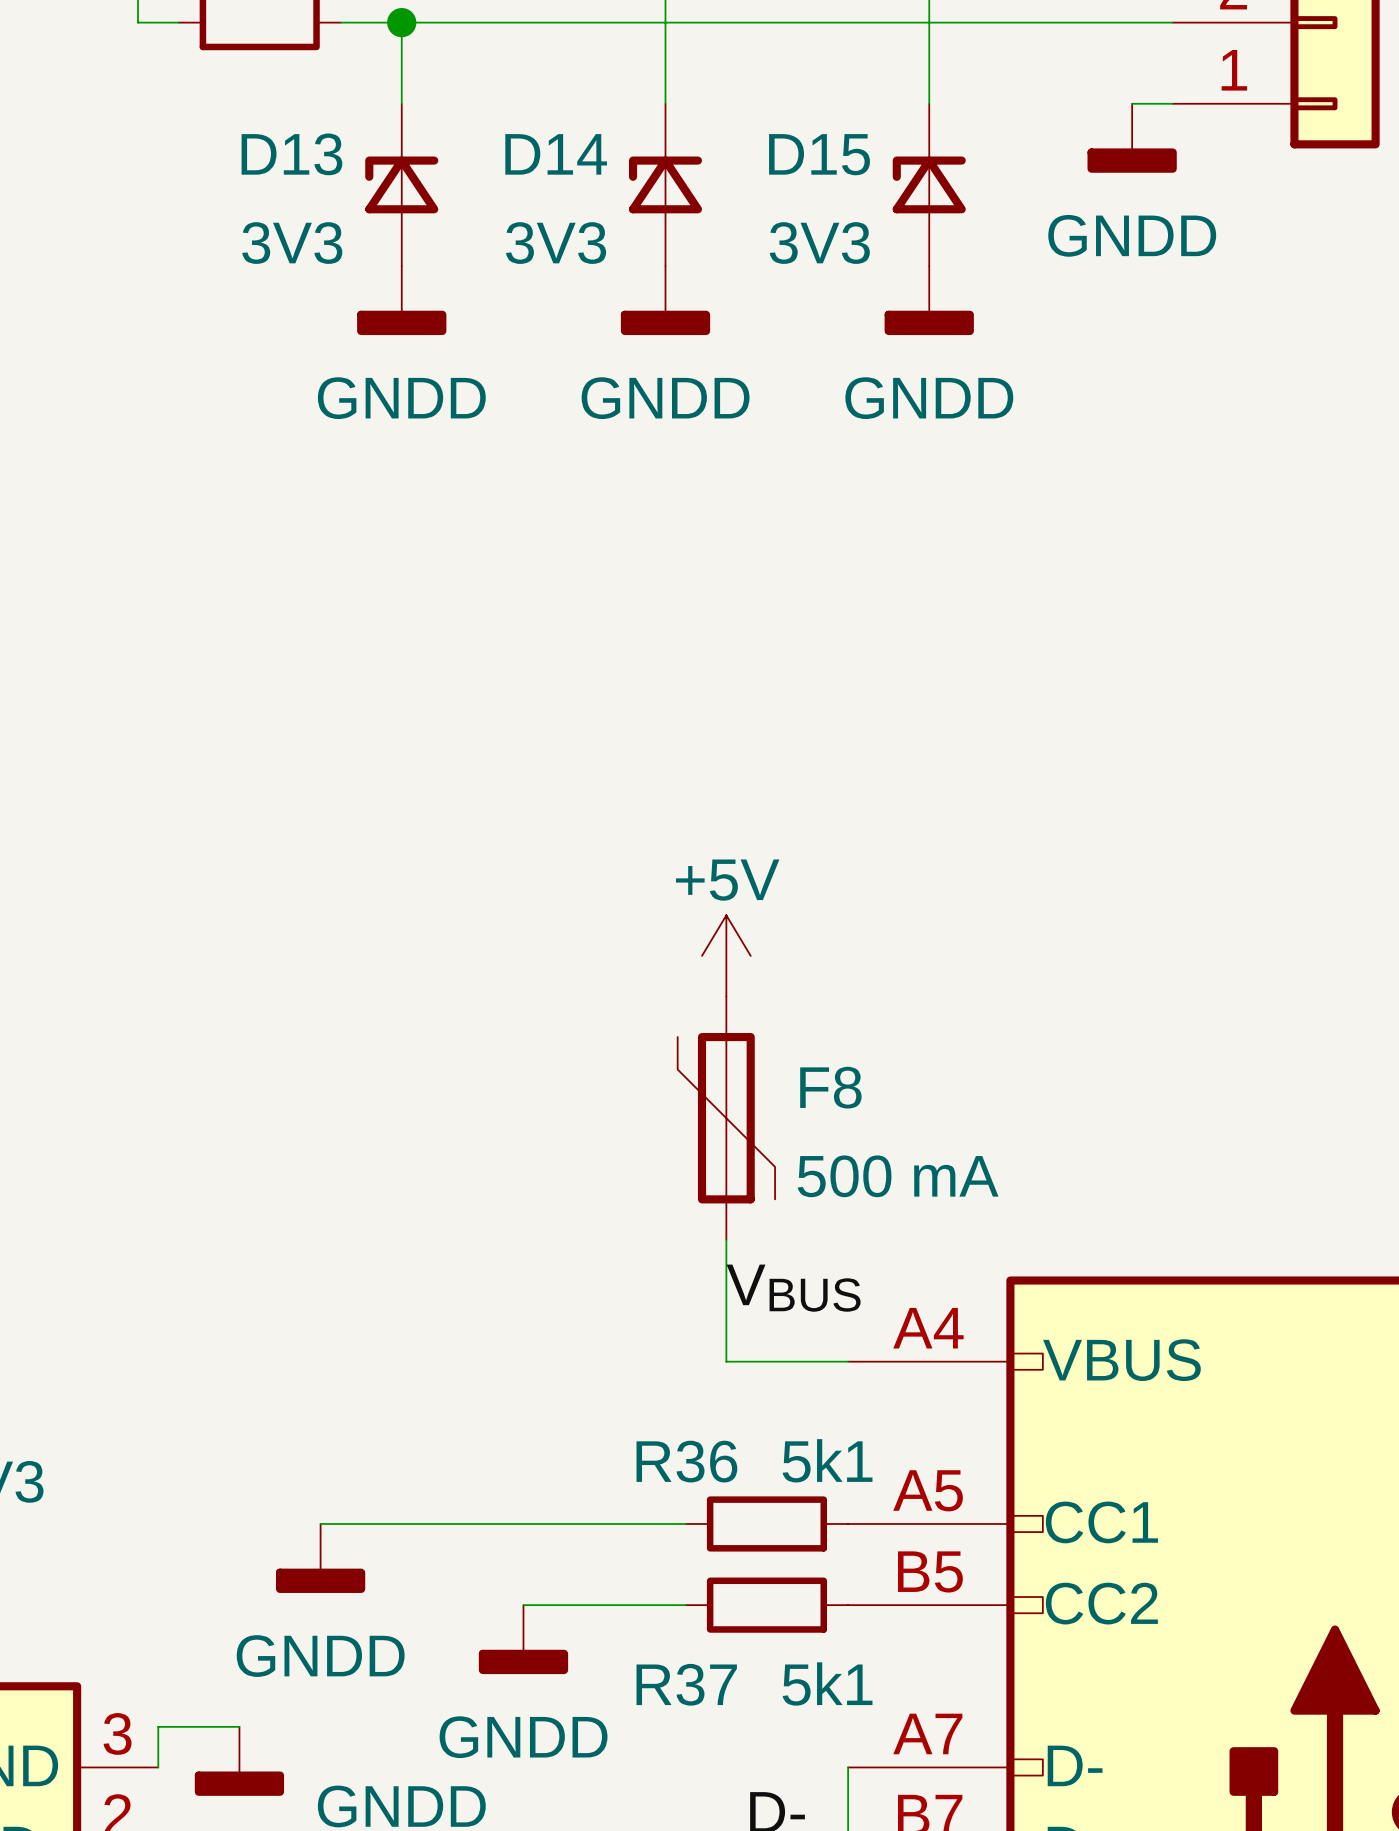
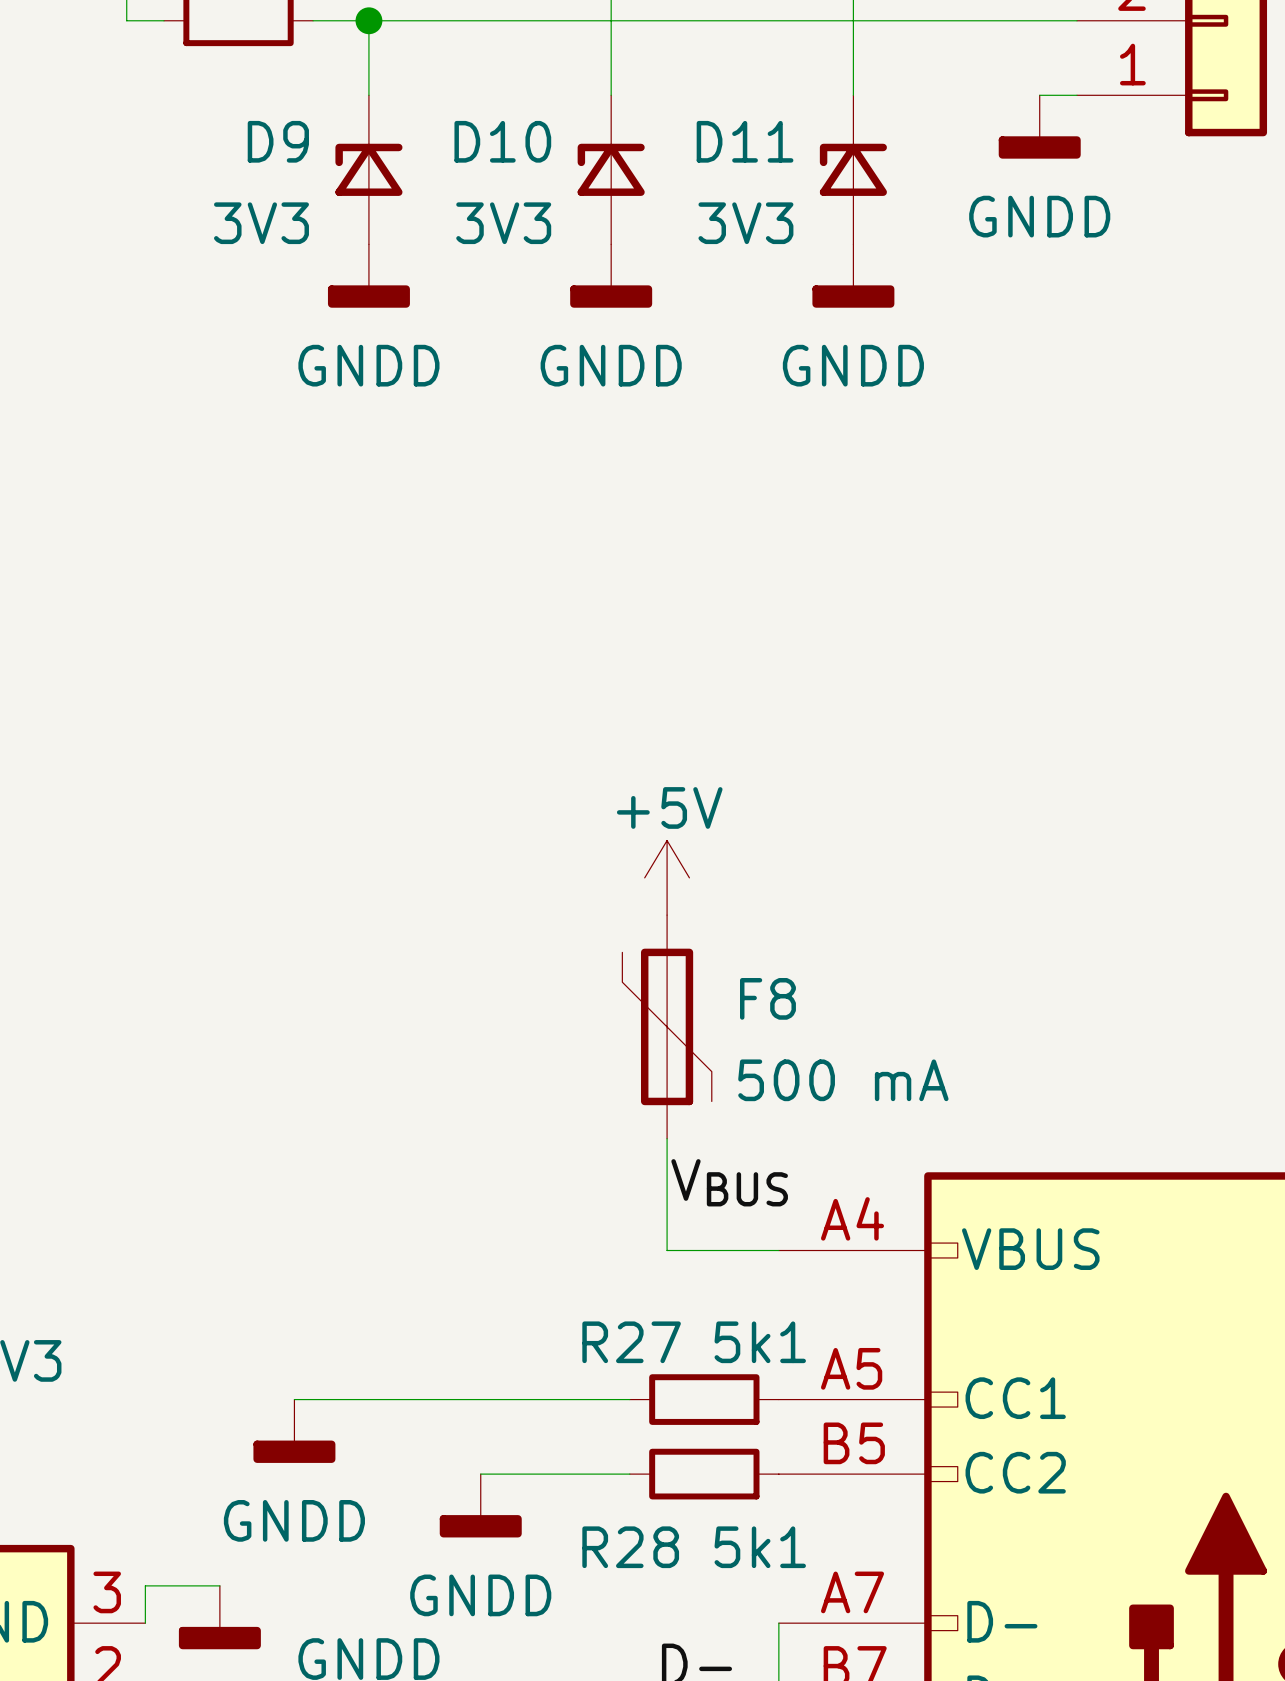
D13 name: D13 (291, 154) -> D9 (278, 141)
D14 name: D14 (556, 154) -> D10 (502, 141)
D15 name: D15 (819, 154) -> D11 (745, 141)
R36 name: R36 (686, 1461) -> R27 (631, 1342)
R37 name: R37 (686, 1684) -> R28 (630, 1547)

